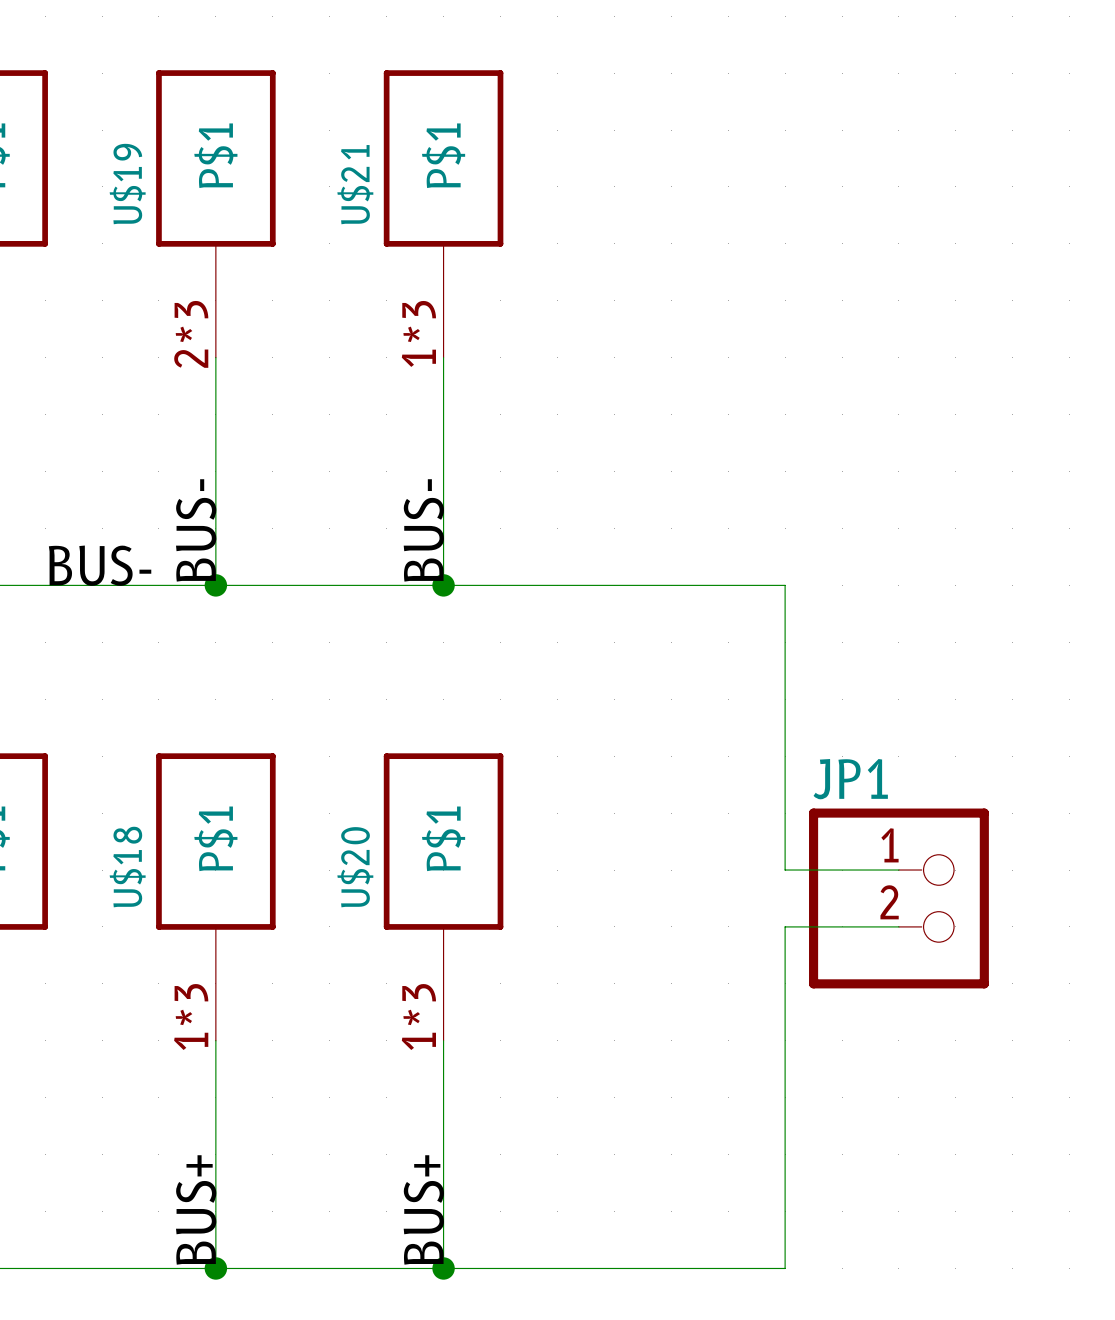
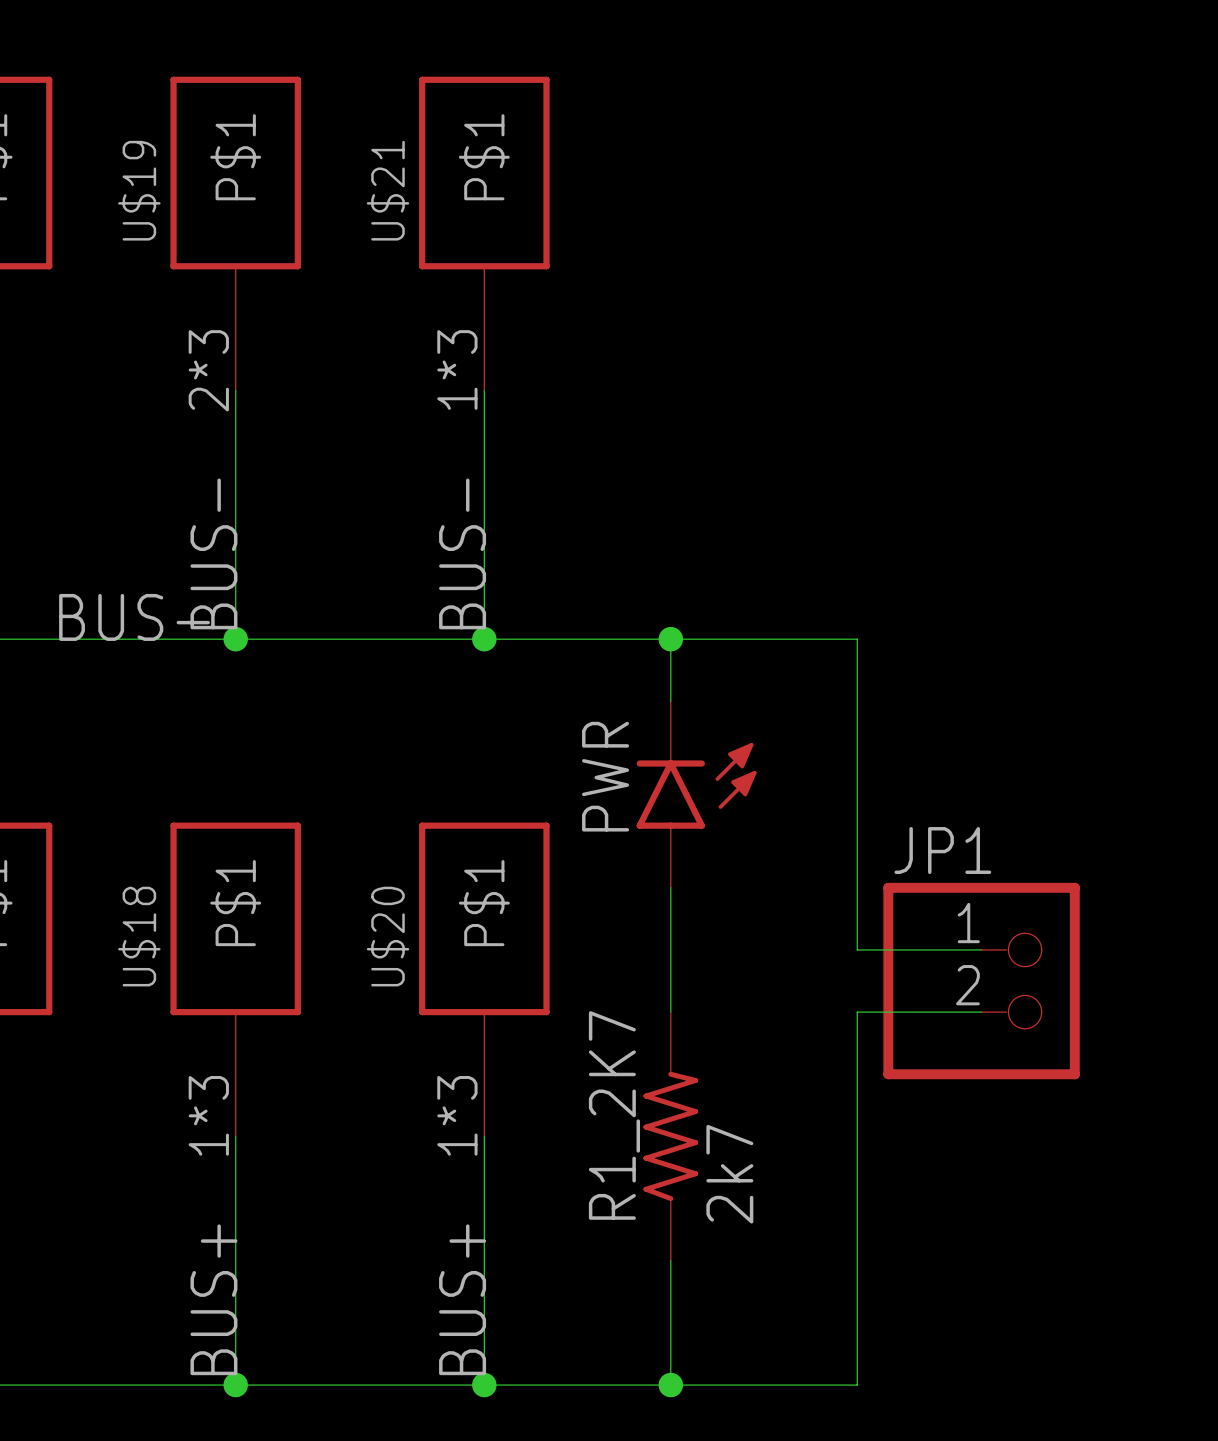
wire: none -> (670, 639) (670, 701)
junction: none -> (670, 639)
PWR: none -> (696, 794)
wire: none -> (670, 887) (670, 1012)
R1_2K7: none -> 2k7 (670, 1136)
wire: none -> (670, 1260) (670, 1385)
junction: none -> (670, 1385)

